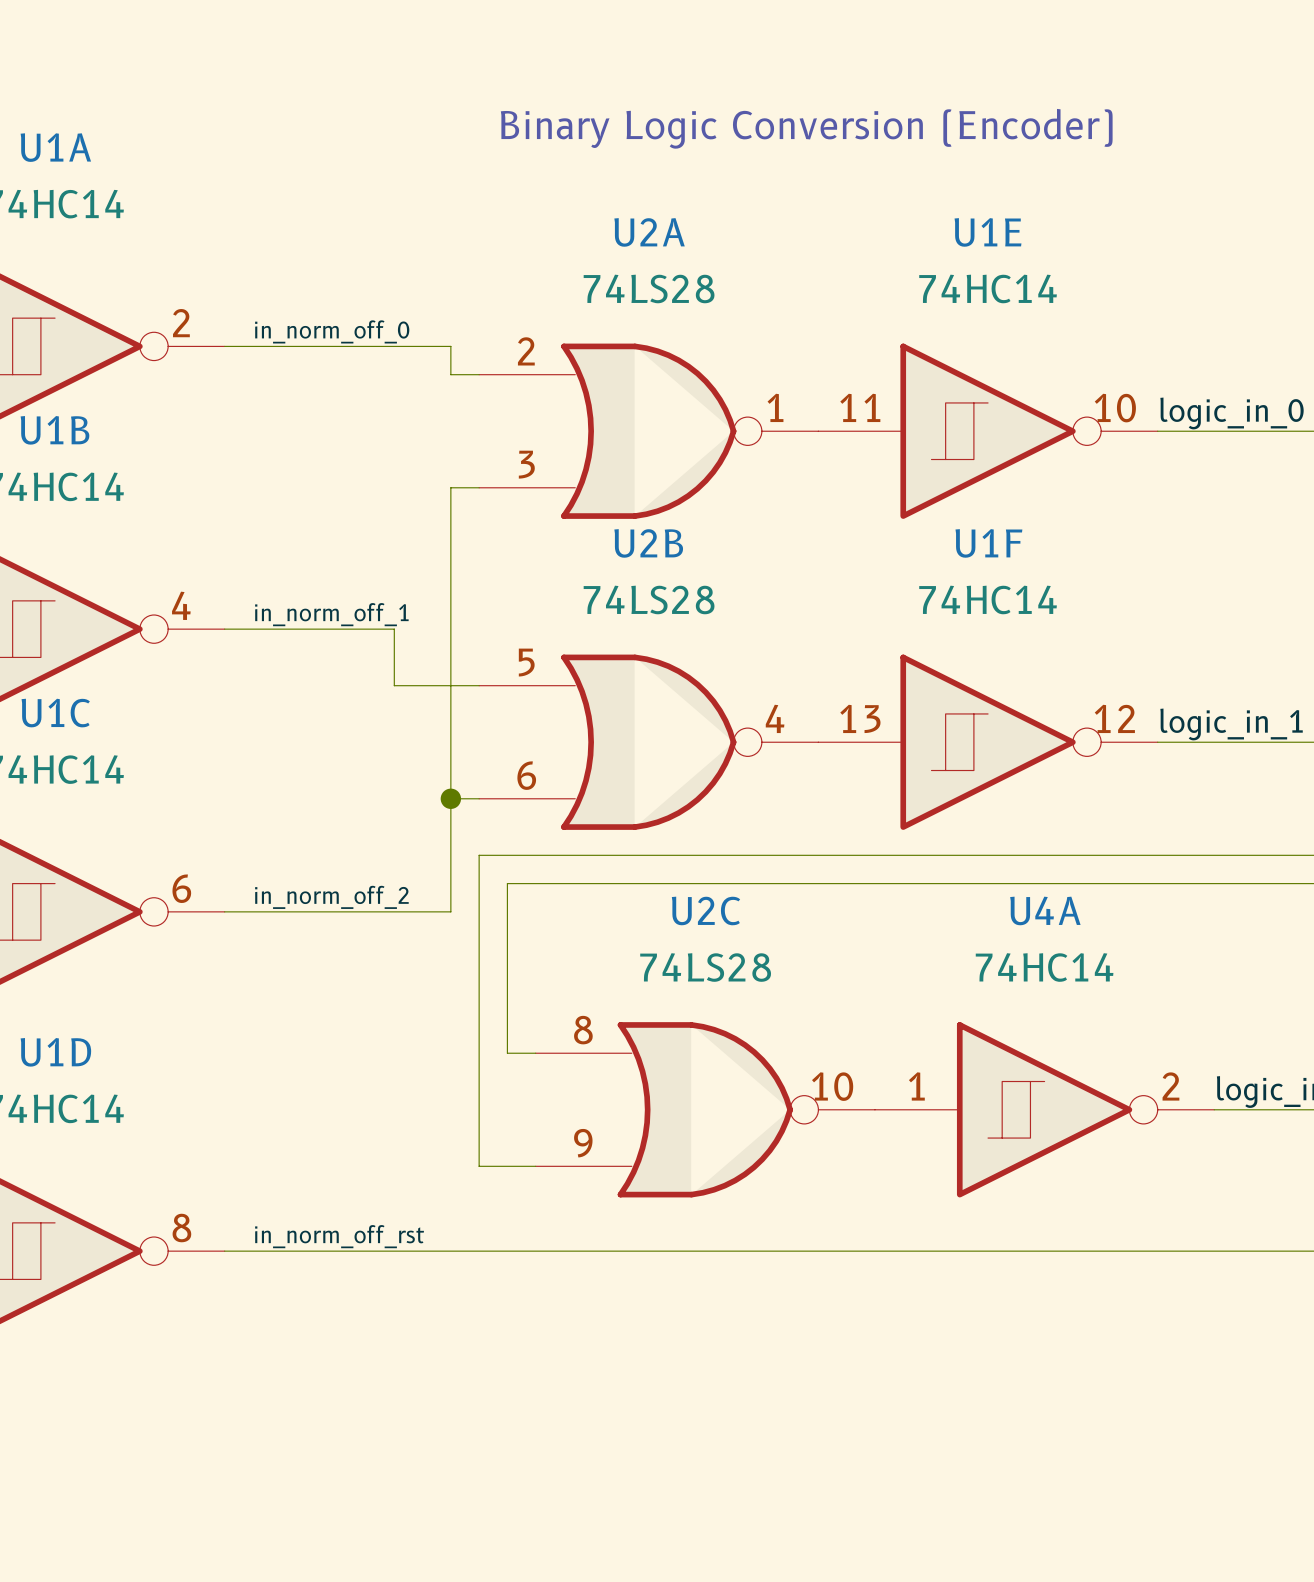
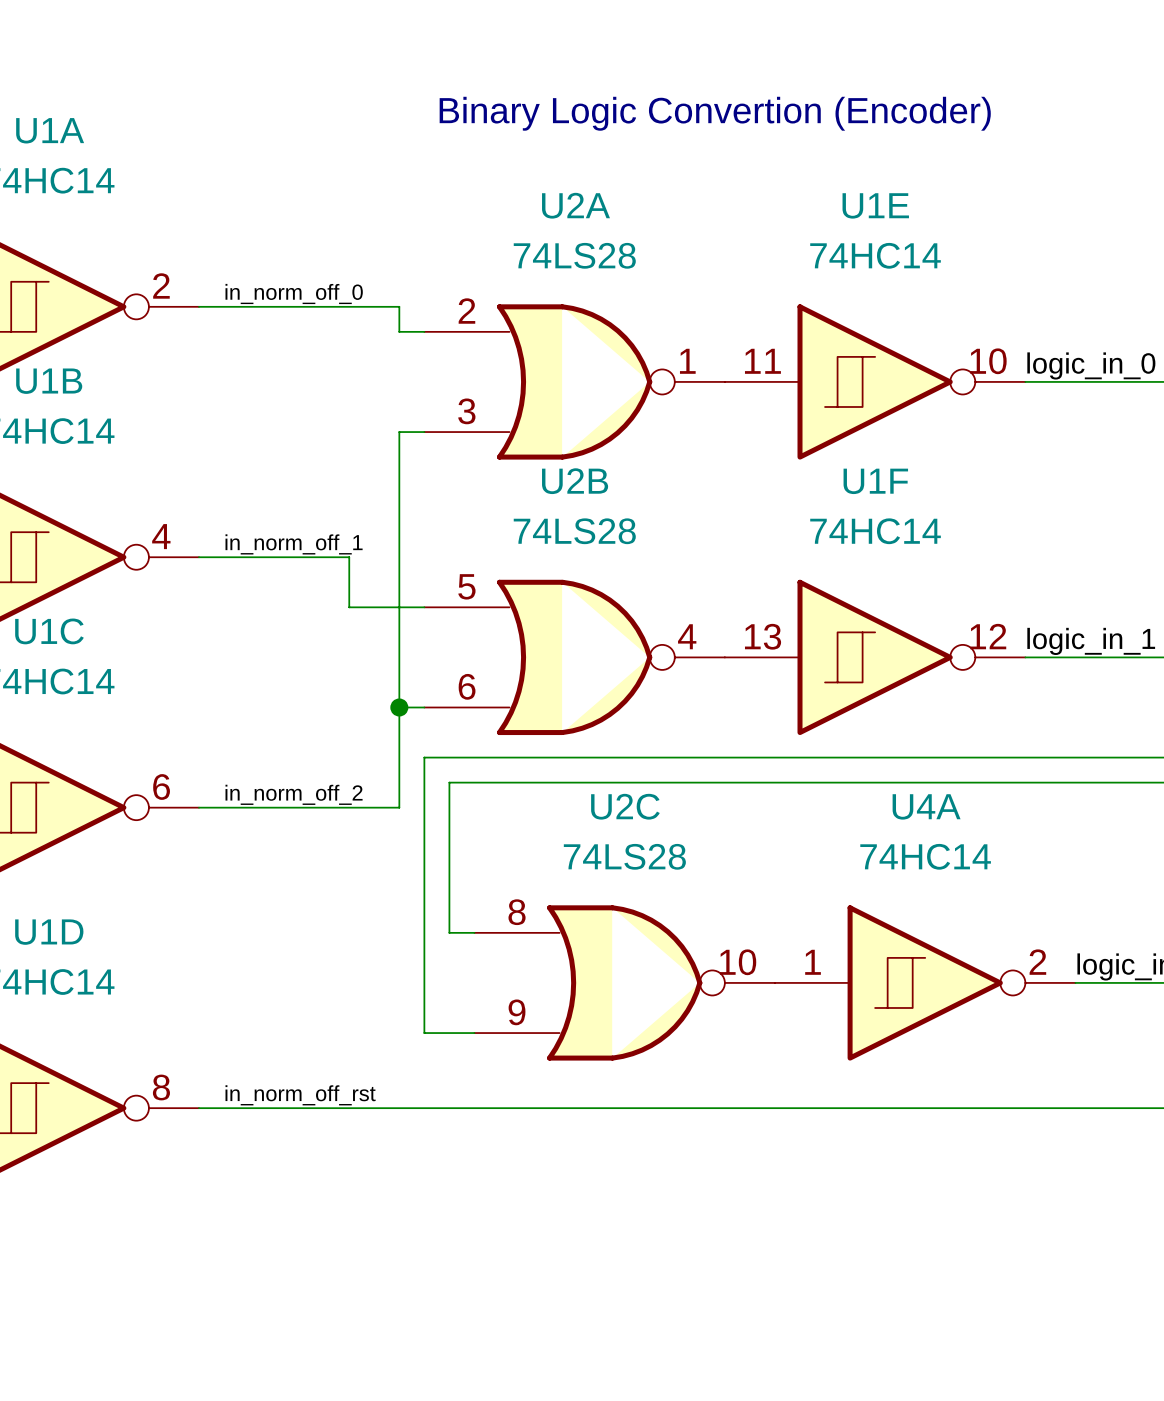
text: Binary Logic Conversion (Encoder) (806, 128) -> Binary Logic Convertion (Encoder) (715, 113)

